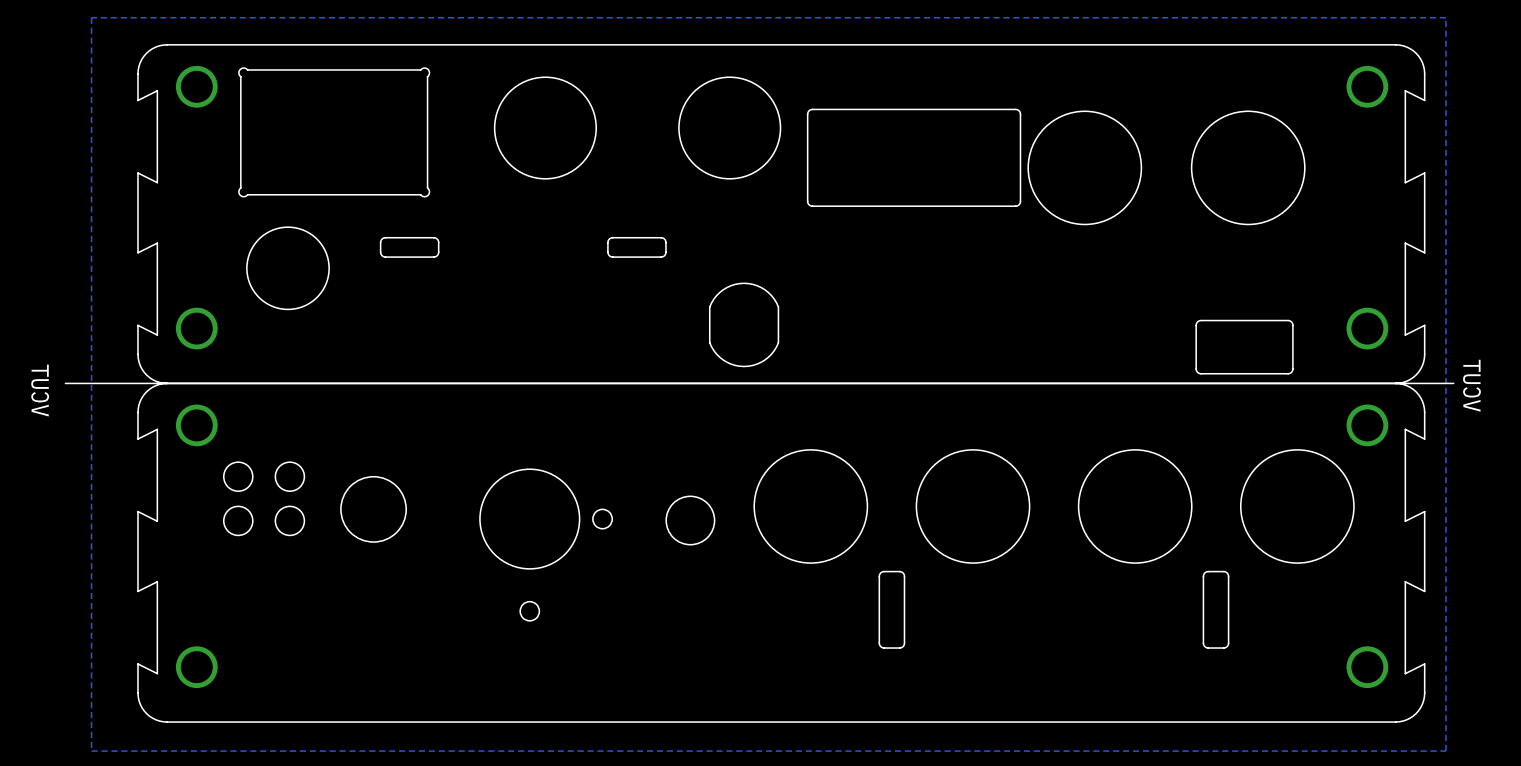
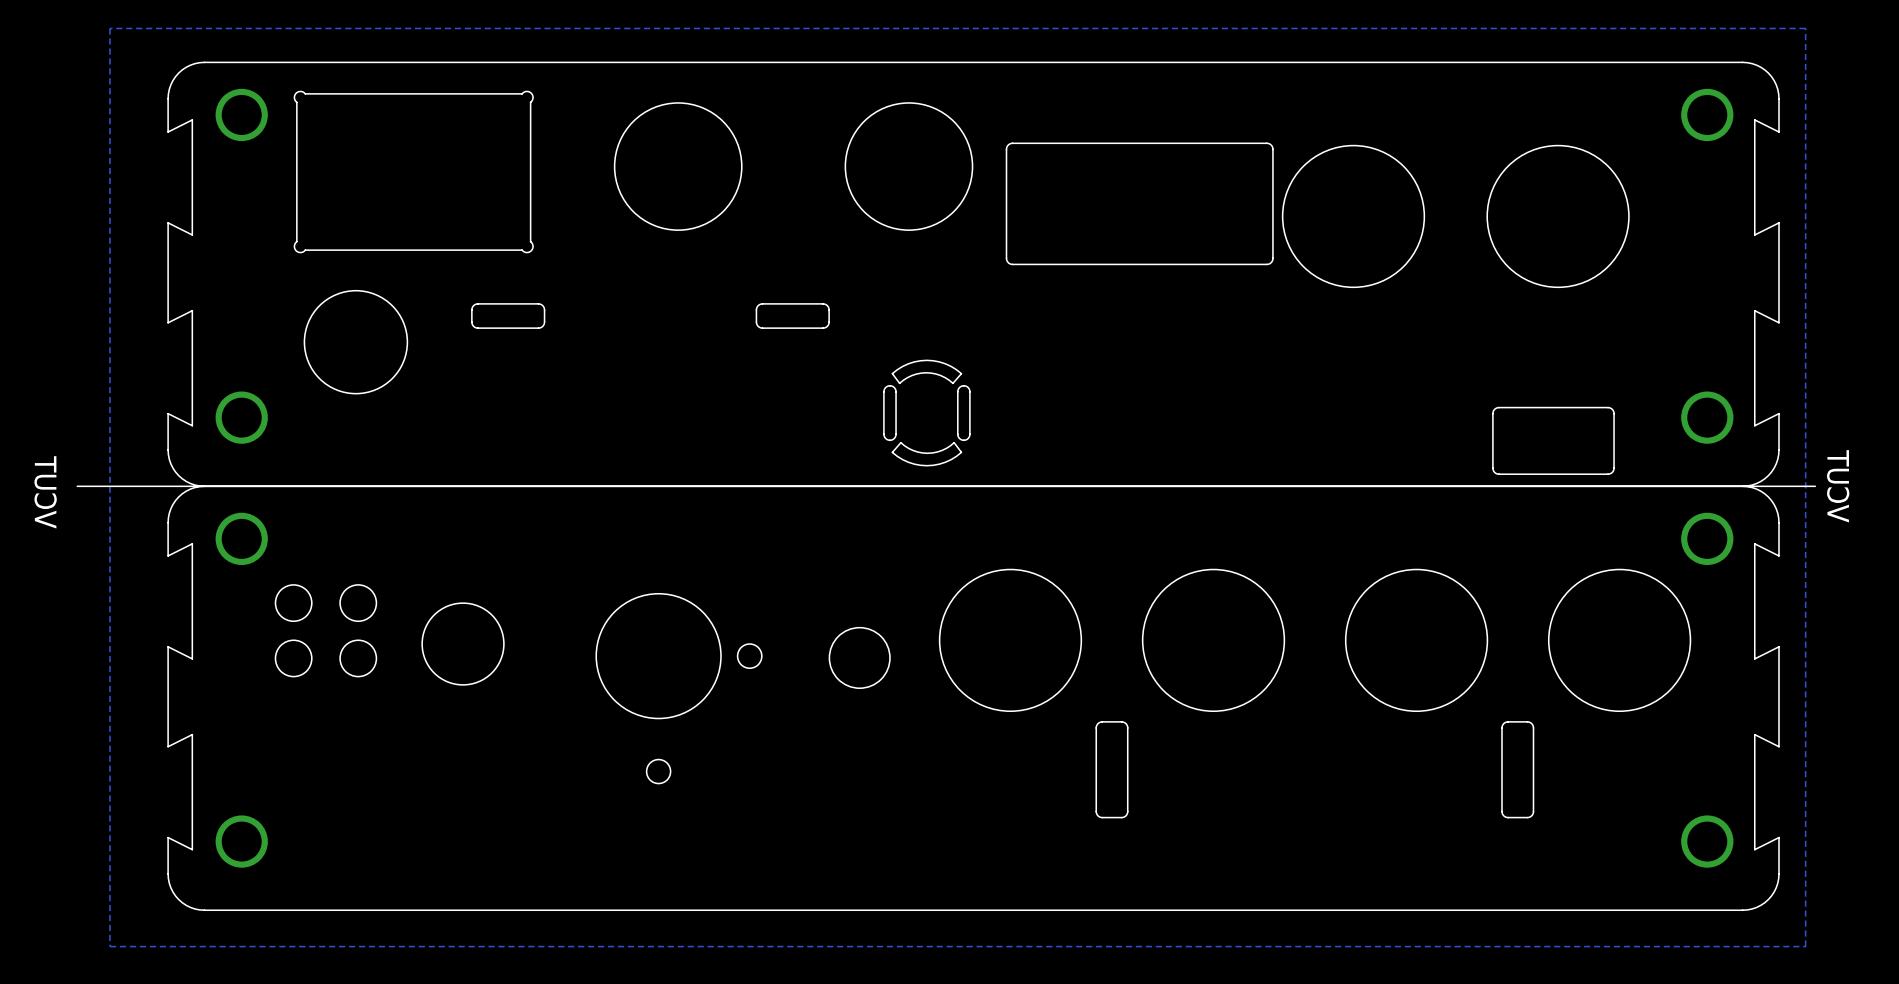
board edge: none -> (961, 373) (952, 383) (940, 375) (926, 372) (911, 375) (899, 383) (892, 373) (908, 363) (926, 360) (945, 363) (961, 373)
board edge: (778, 307) (774, 299) (764, 289) (757, 285) (744, 283) (731, 285) (723, 289) (713, 299) (709, 307) -> (969, 391) (968, 387) (963, 385) (959, 387) (957, 391) (958, 435) (964, 440) (969, 434)
board edge: (778, 341) (774, 350) (764, 359) (757, 364) (744, 366) (731, 364) (723, 359) (713, 350) (709, 341) -> (883, 391) (885, 387) (889, 385) (894, 387) (896, 391) (895, 435) (889, 440) (883, 434)
board edge: none -> (954, 442) (961, 452) (945, 462) (933, 465) (920, 465) (908, 462) (892, 452) (900, 442) (913, 450) (927, 453) (941, 450) (954, 442)

